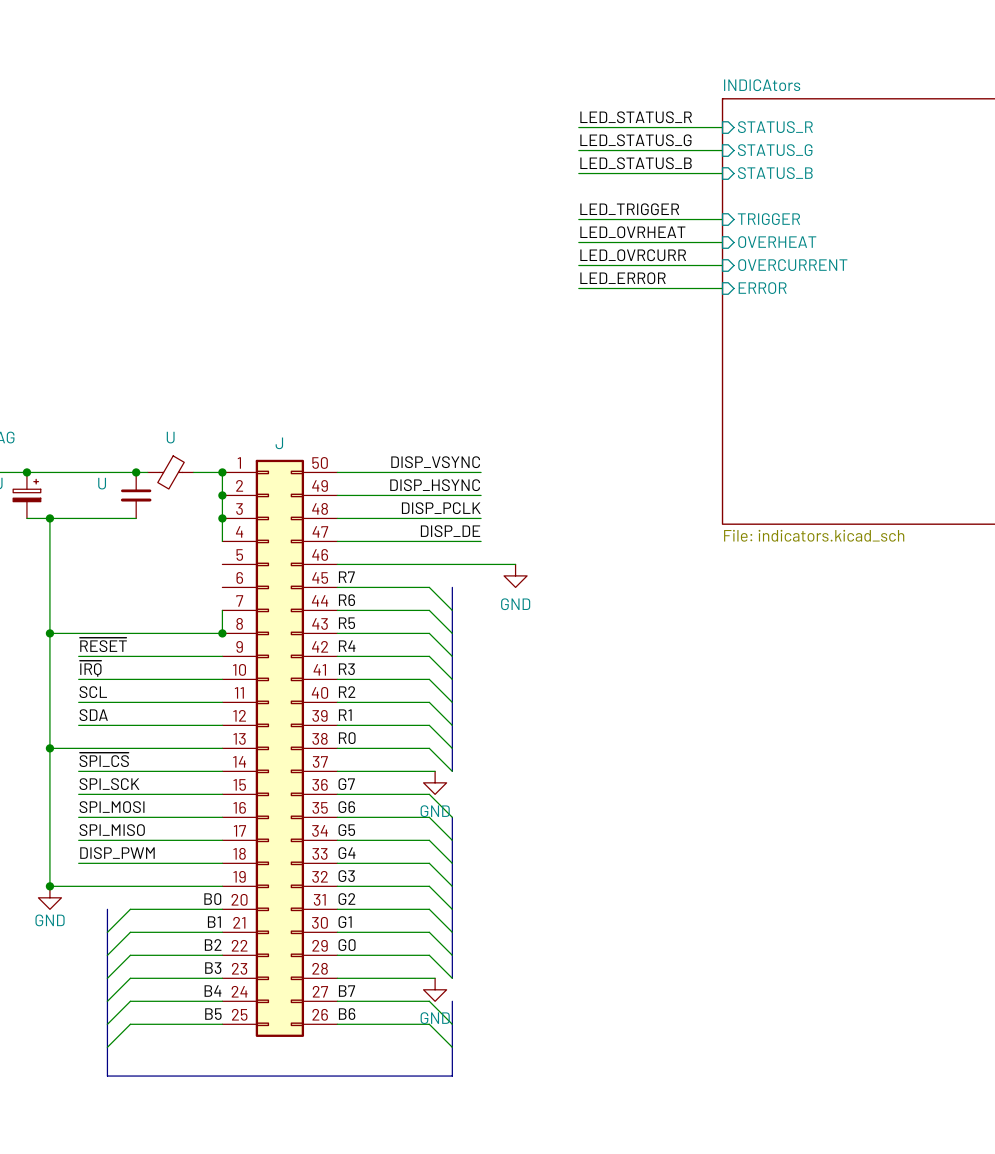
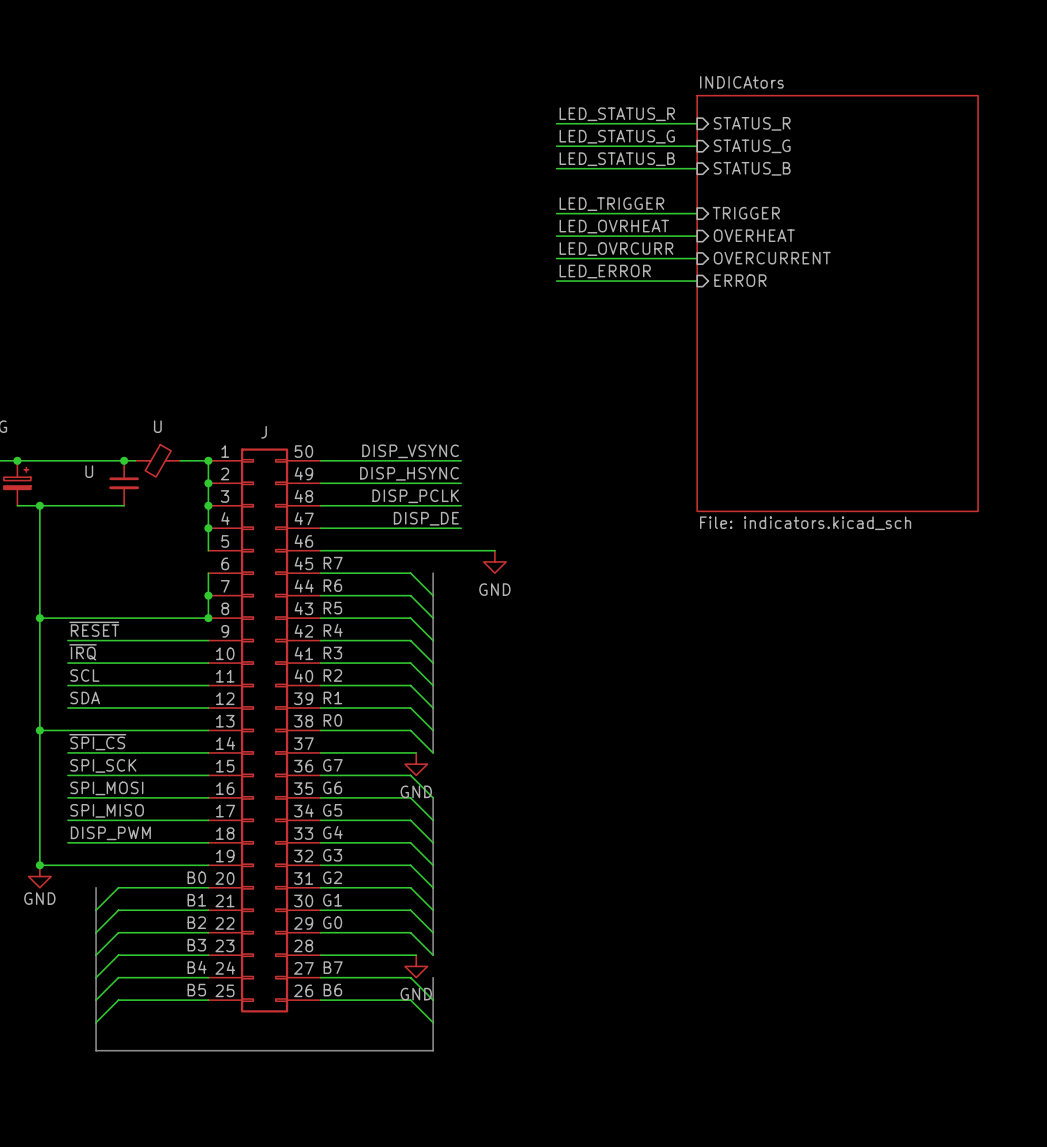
wire: none -> (208, 528) (208, 550)
junction: none -> (208, 528)
wire: none -> (208, 573) (208, 595)
junction: none -> (208, 595)

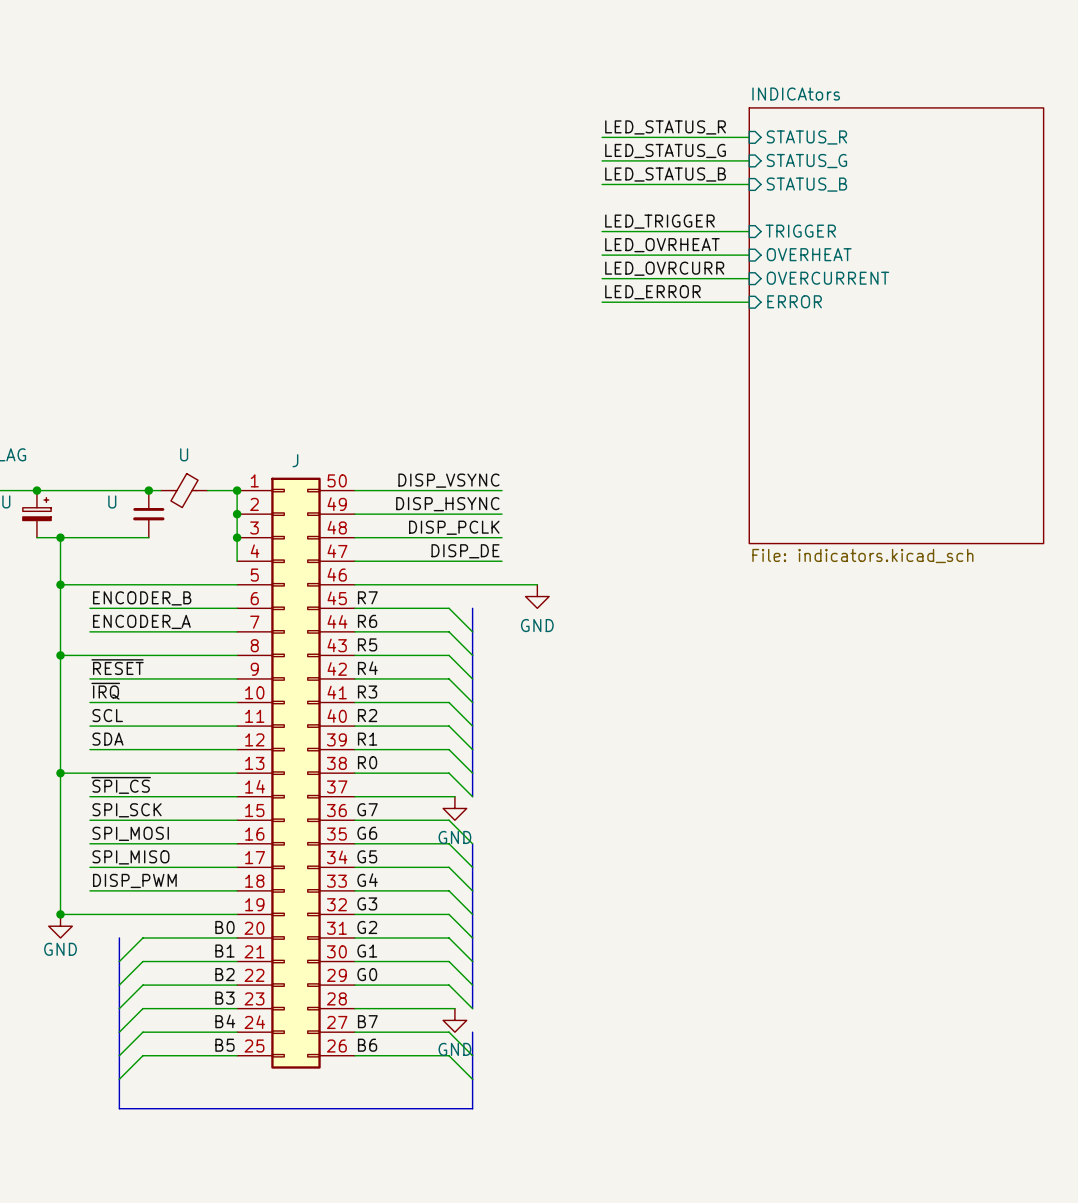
wire: (208, 528) (208, 550) -> (60, 584) (237, 584)
junction: (208, 528) -> none
junction: none -> (60, 584)
label: none -> ENCODER_B (142, 598)
wire: (208, 573) (208, 618) -> (237, 608) (89, 608)
label: none -> ENCODER_A (141, 621)
wire: none -> (89, 631) (237, 631)
junction: (208, 595) -> none
junction: (208, 618) -> none

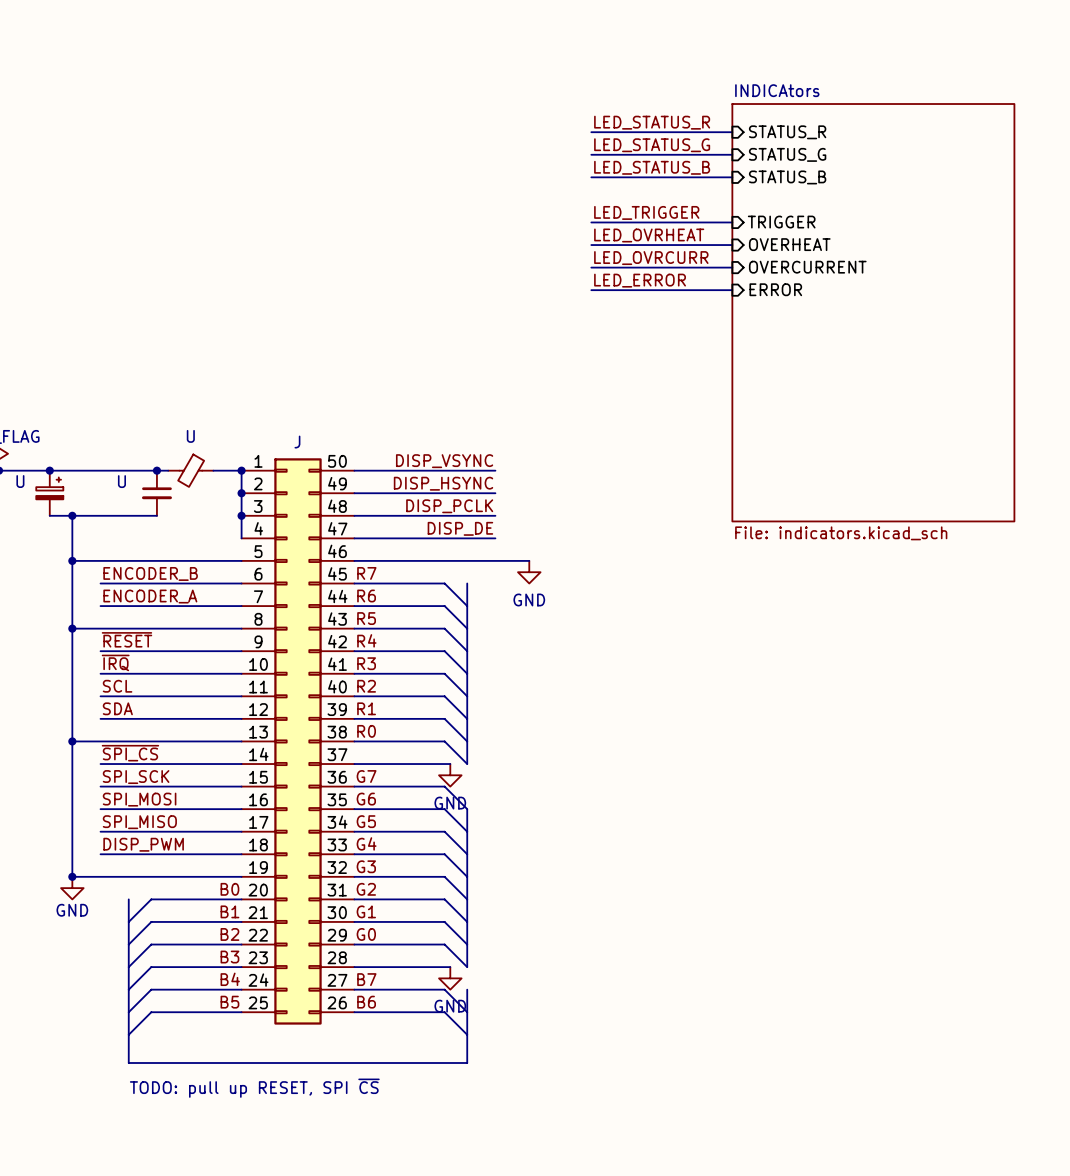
text: none -> TODO: pull up RESET, SPI ~{CS} (254, 1088)

